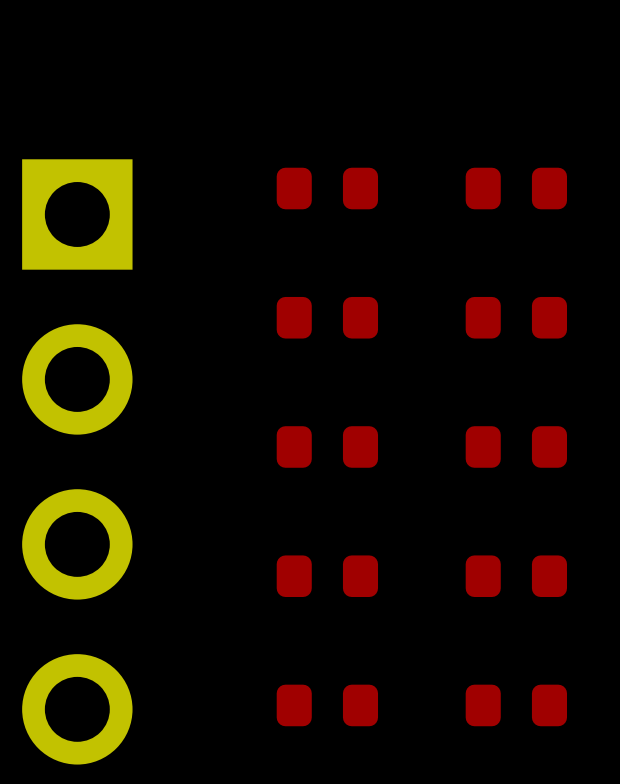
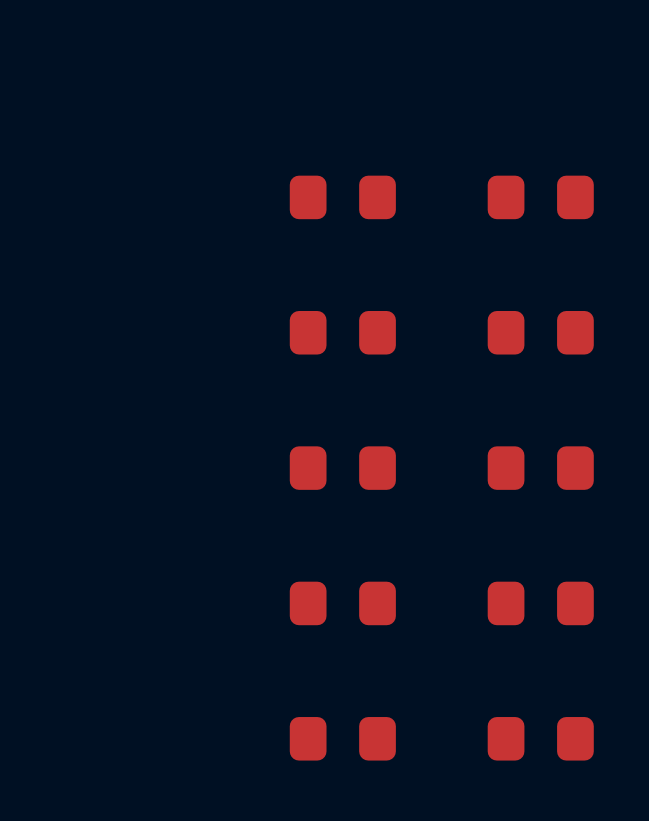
part: (77, 461) -> none

